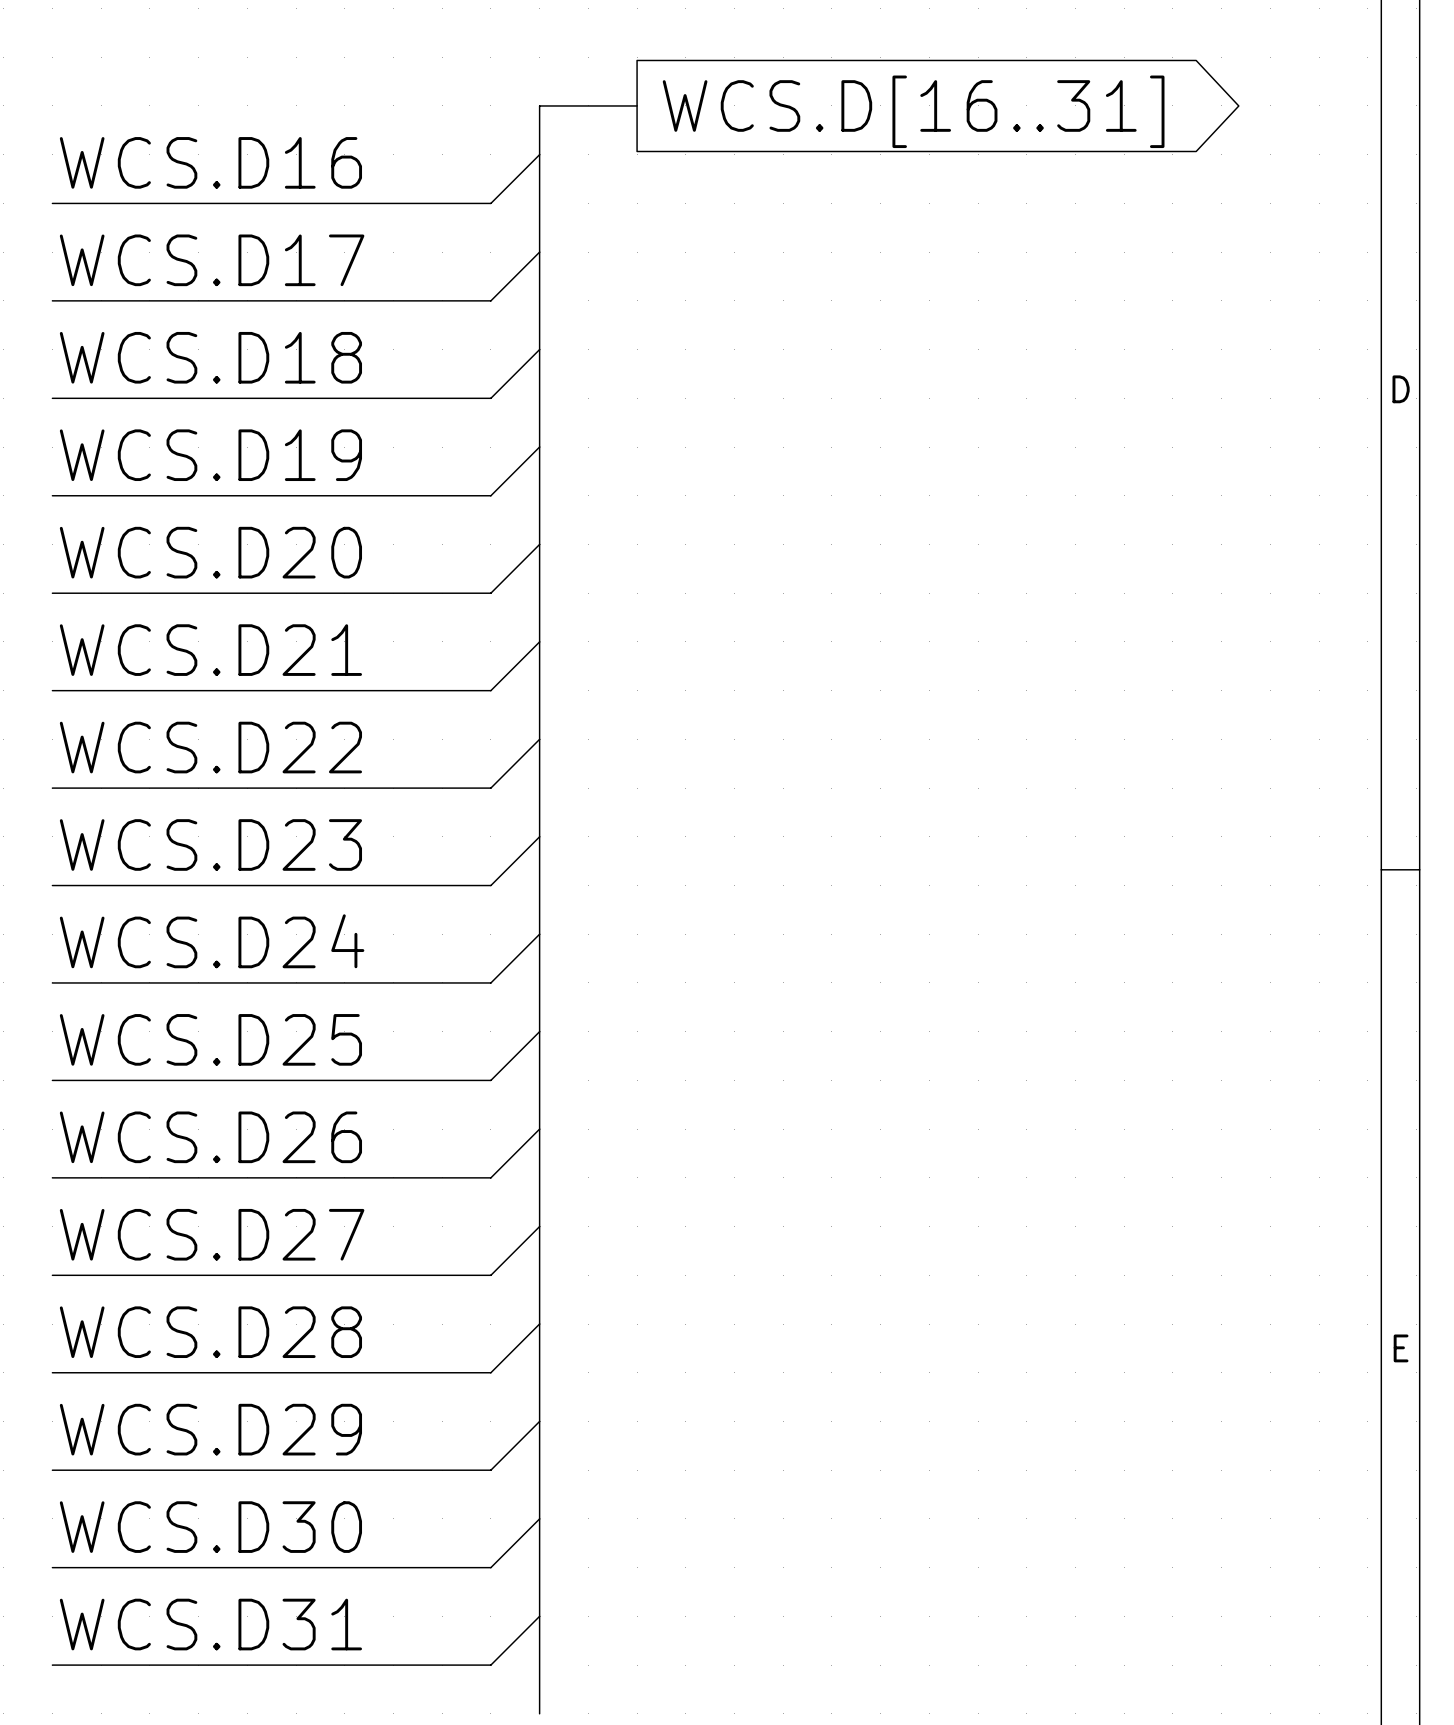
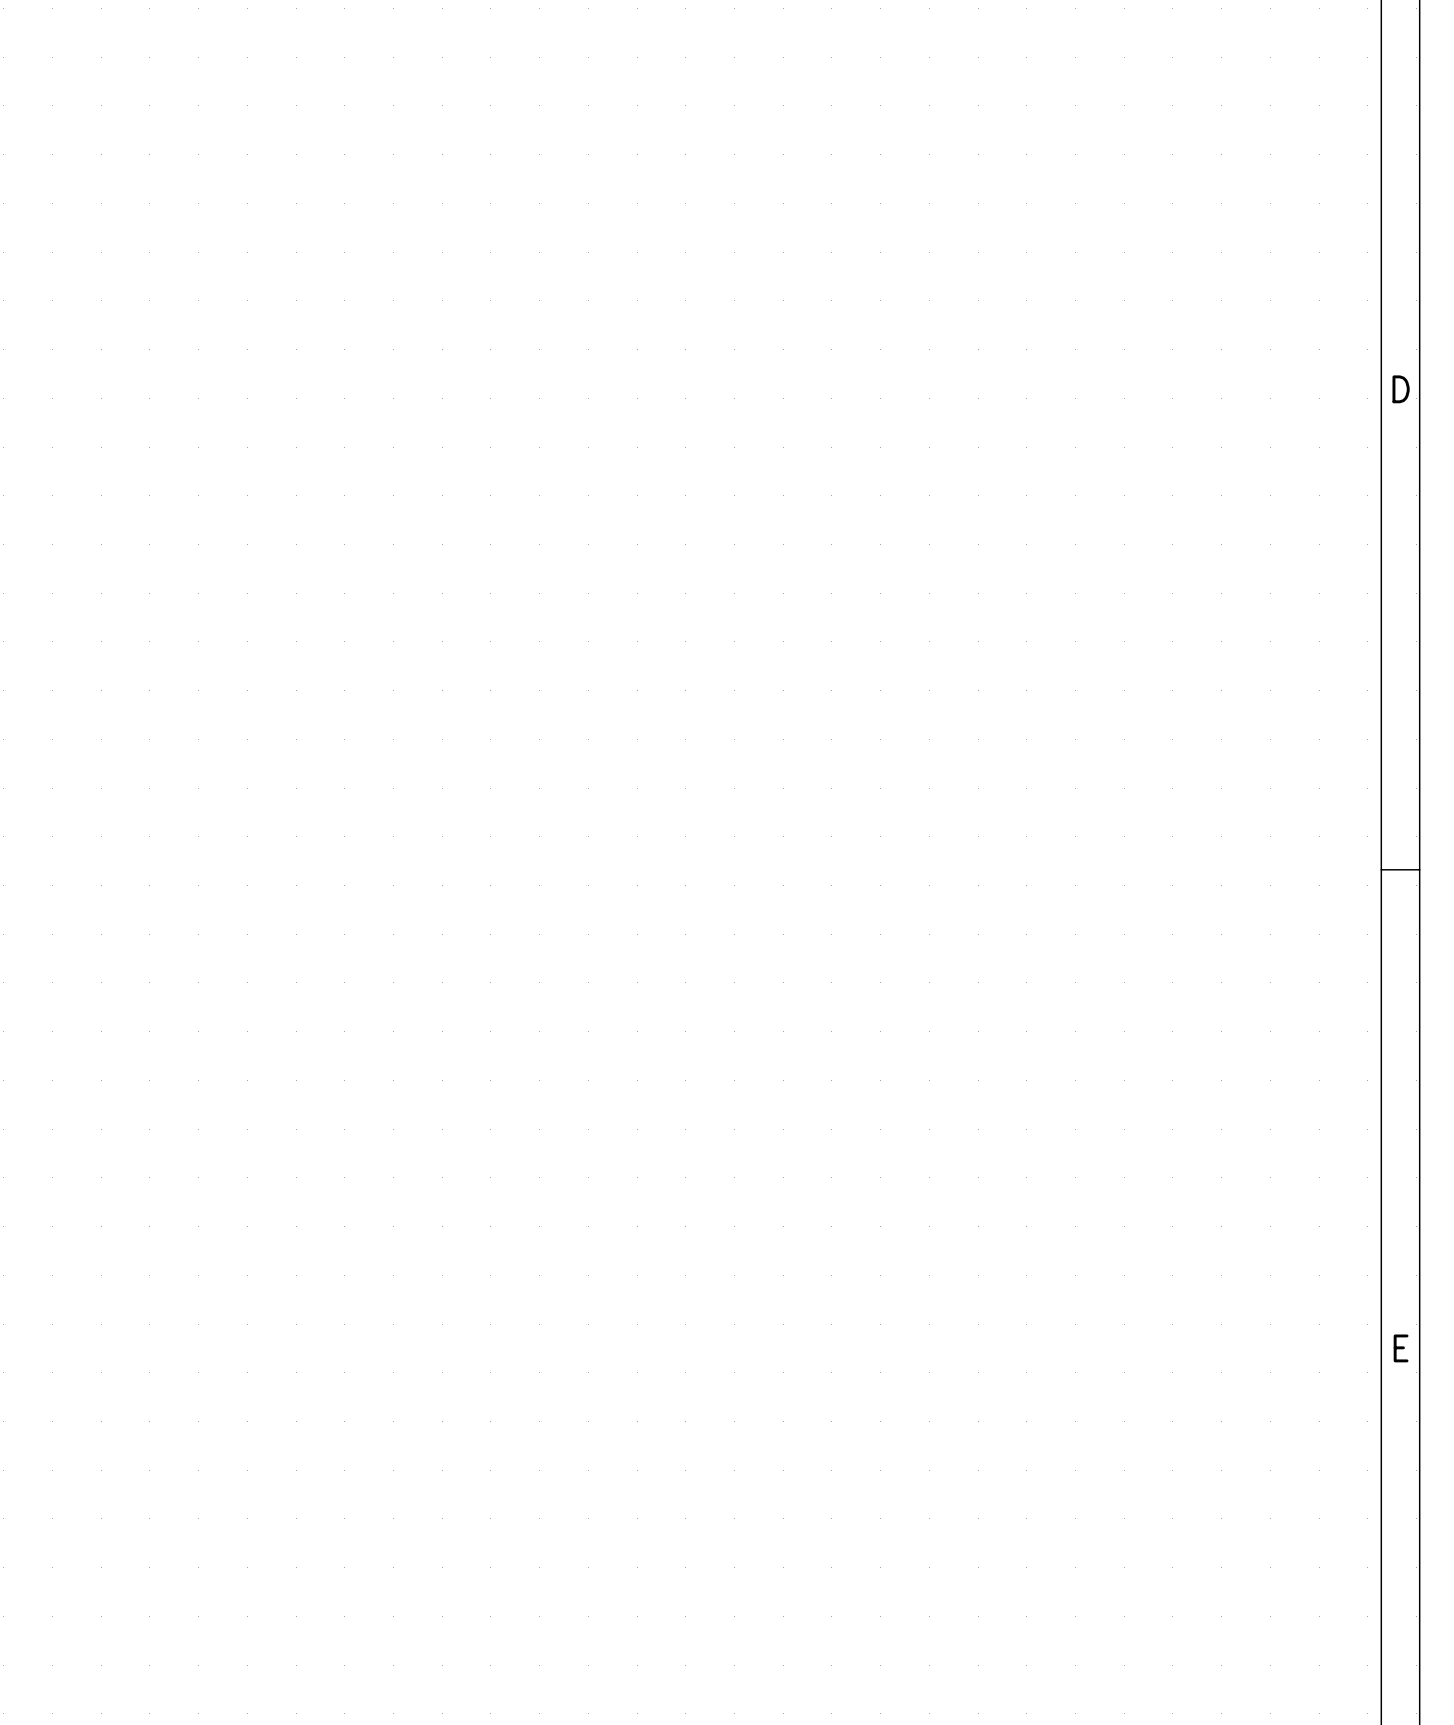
bus: (637, 105) (539, 105) (539, 1713) -> none
global label: WCS.D[16..31] (913, 111) -> none
wire: (539, 154) (490, 203) (52, 203) -> none
label: WCS.D16 (210, 162) -> none
wire: (539, 252) (490, 300) (52, 300) -> none
label: WCS.D17 (212, 260) -> none
wire: (539, 349) (490, 398) (52, 398) -> none
label: WCS.D18 (210, 357) -> none
wire: (539, 447) (490, 495) (52, 495) -> none
label: WCS.D19 (210, 455) -> none
wire: (539, 544) (490, 593) (52, 593) -> none
label: WCS.D20 (210, 552) -> none
wire: (539, 641) (490, 690) (52, 690) -> none
label: WCS.D21 (210, 650) -> none
wire: (539, 739) (490, 788) (52, 788) -> none
label: WCS.D22 (210, 747) -> none
wire: (539, 836) (490, 885) (52, 885) -> none
label: WCS.D23 (210, 844) -> none
wire: (539, 934) (490, 982) (52, 982) -> none
label: WCS.D24 (212, 941) -> none
wire: (539, 1031) (490, 1080) (52, 1080) -> none
label: WCS.D25 (210, 1039) -> none
wire: (539, 1129) (490, 1177) (52, 1177) -> none
label: WCS.D26 (210, 1137) -> none
wire: (539, 1226) (490, 1275) (52, 1275) -> none
label: WCS.D27 (212, 1234) -> none
wire: (539, 1324) (490, 1372) (52, 1372) -> none
label: WCS.D28 (210, 1332) -> none
wire: (539, 1421) (490, 1470) (52, 1470) -> none
label: WCS.D29 (210, 1429) -> none
wire: (539, 1518) (490, 1567) (52, 1567) -> none
label: WCS.D30 (210, 1527) -> none
wire: (539, 1616) (490, 1665) (52, 1665) -> none
label: WCS.D31 (210, 1624) -> none

